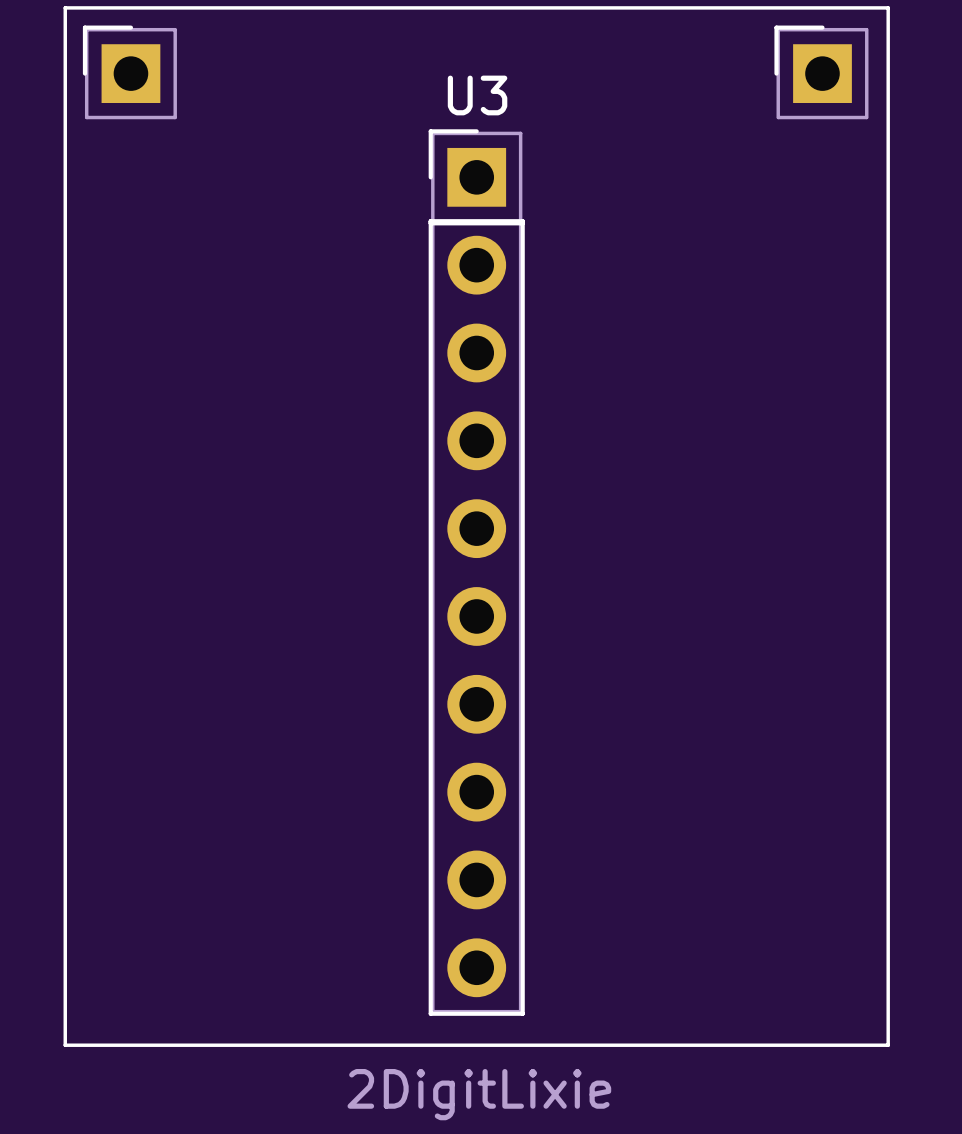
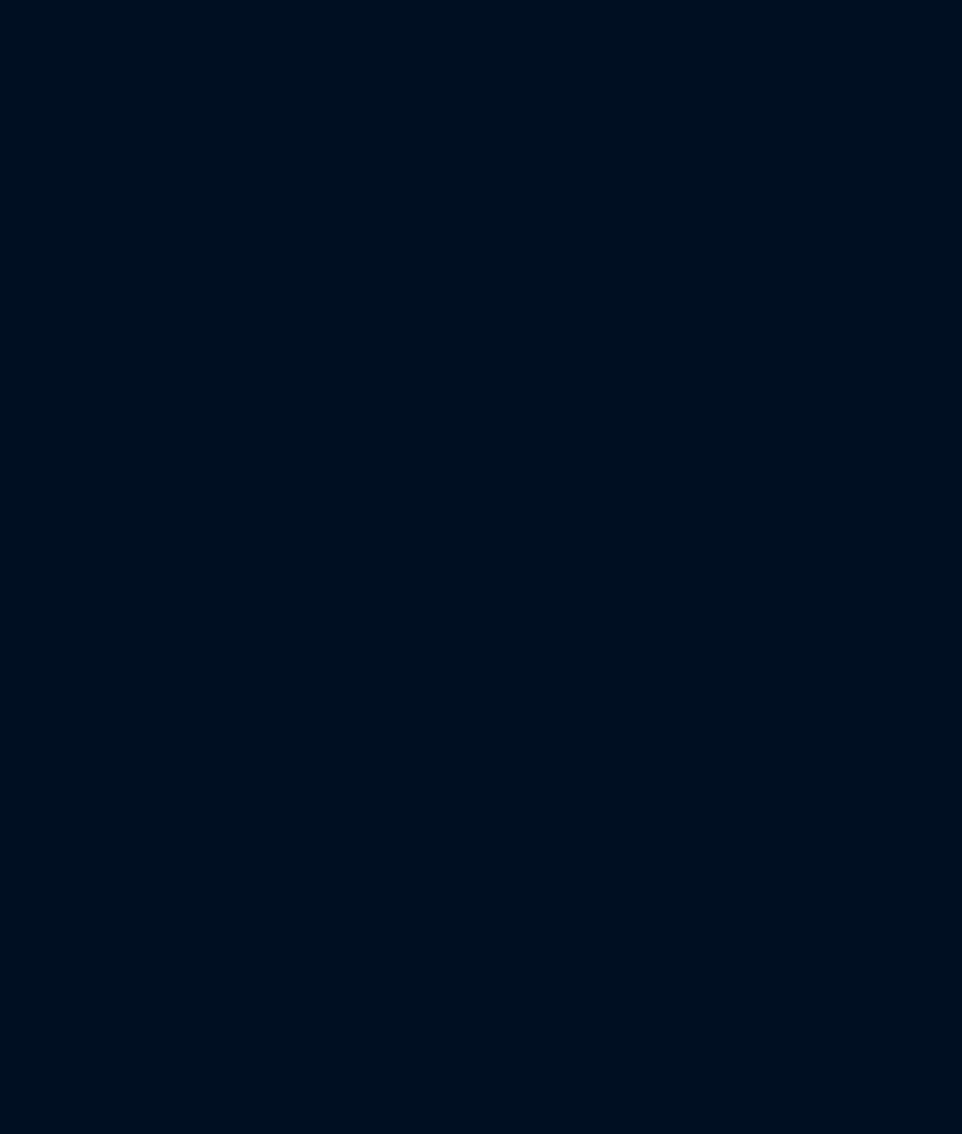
U3: 2DigitLixie (476, 526) -> none

